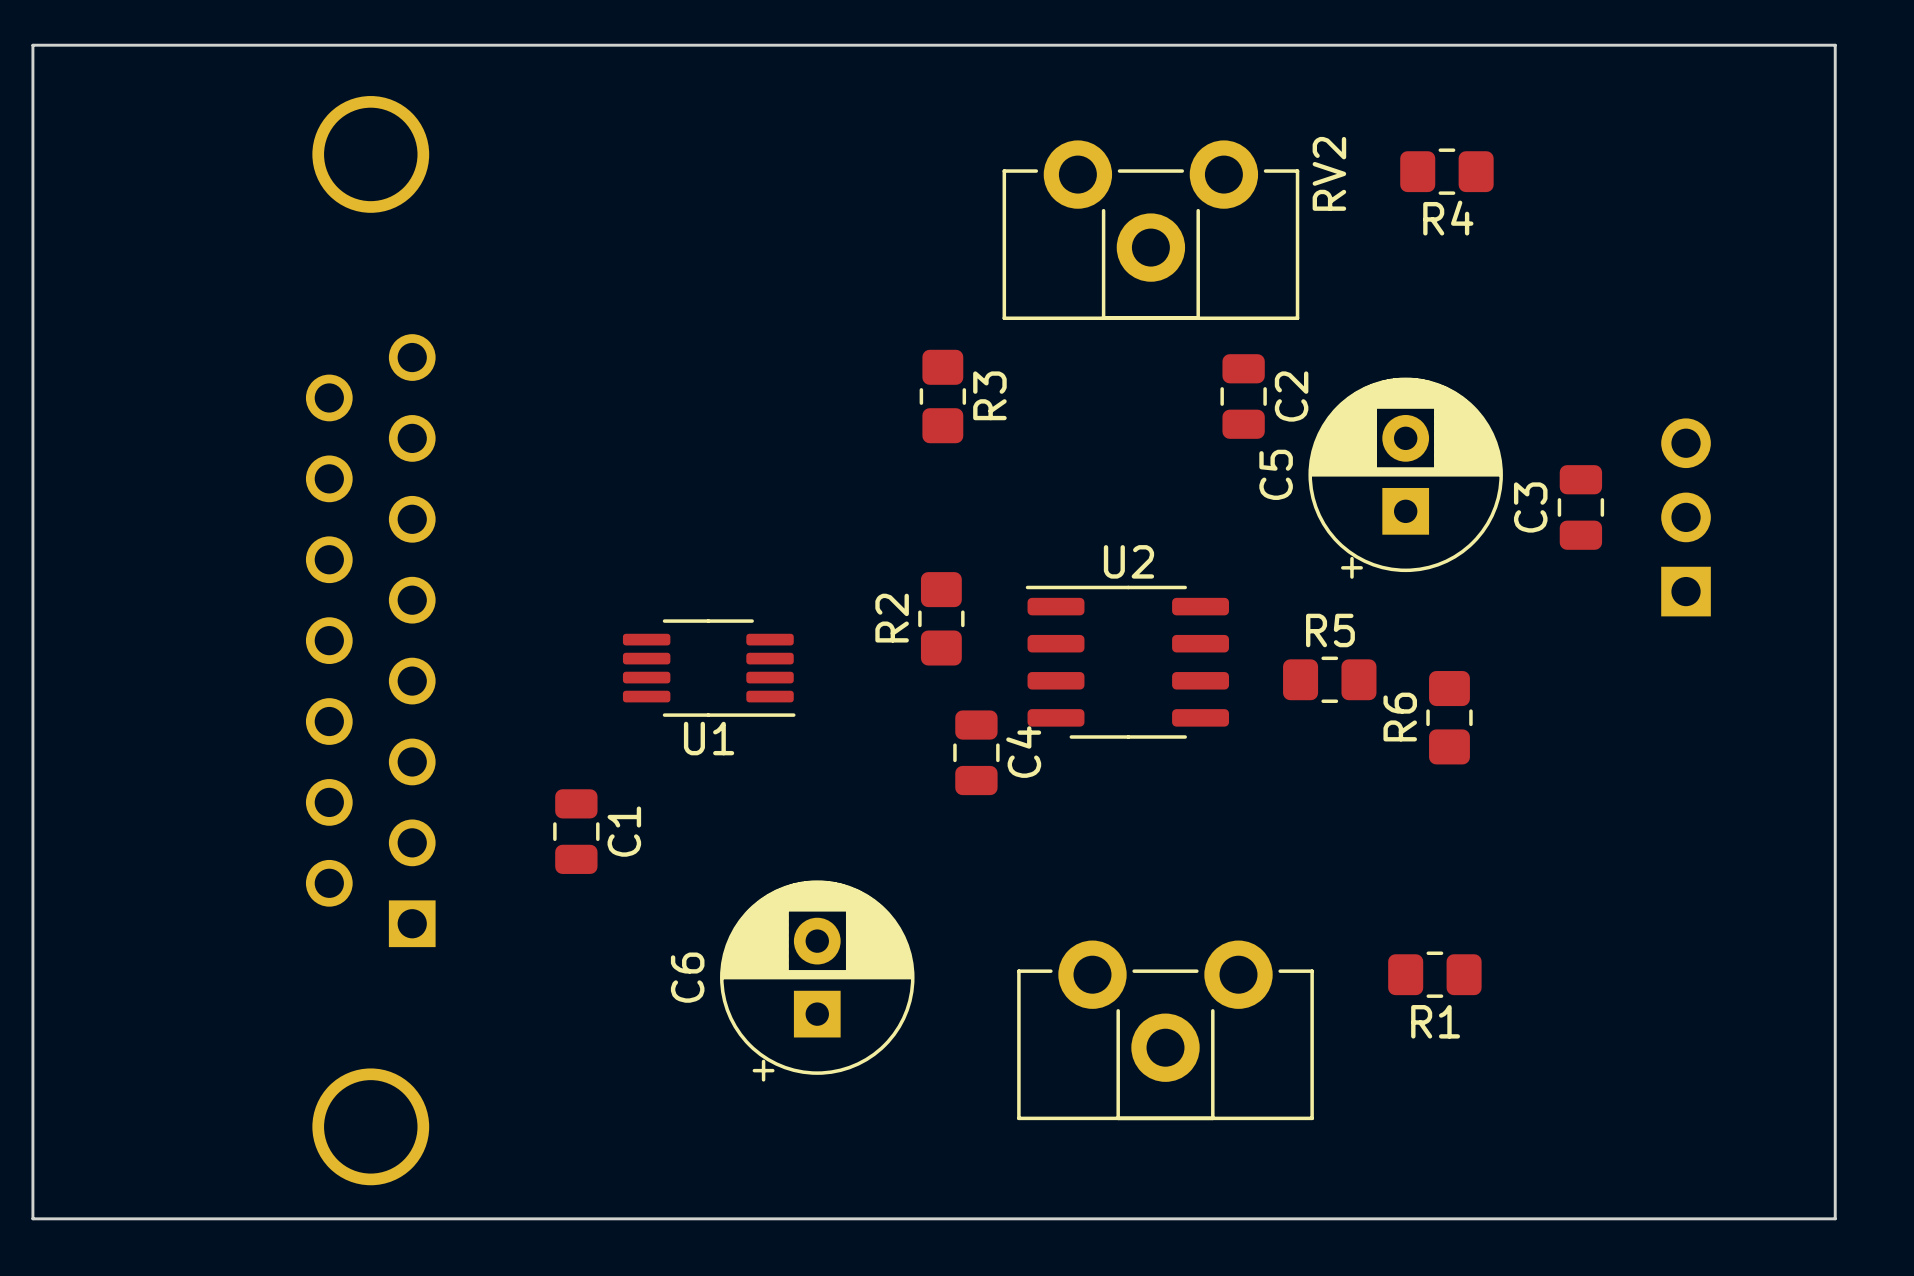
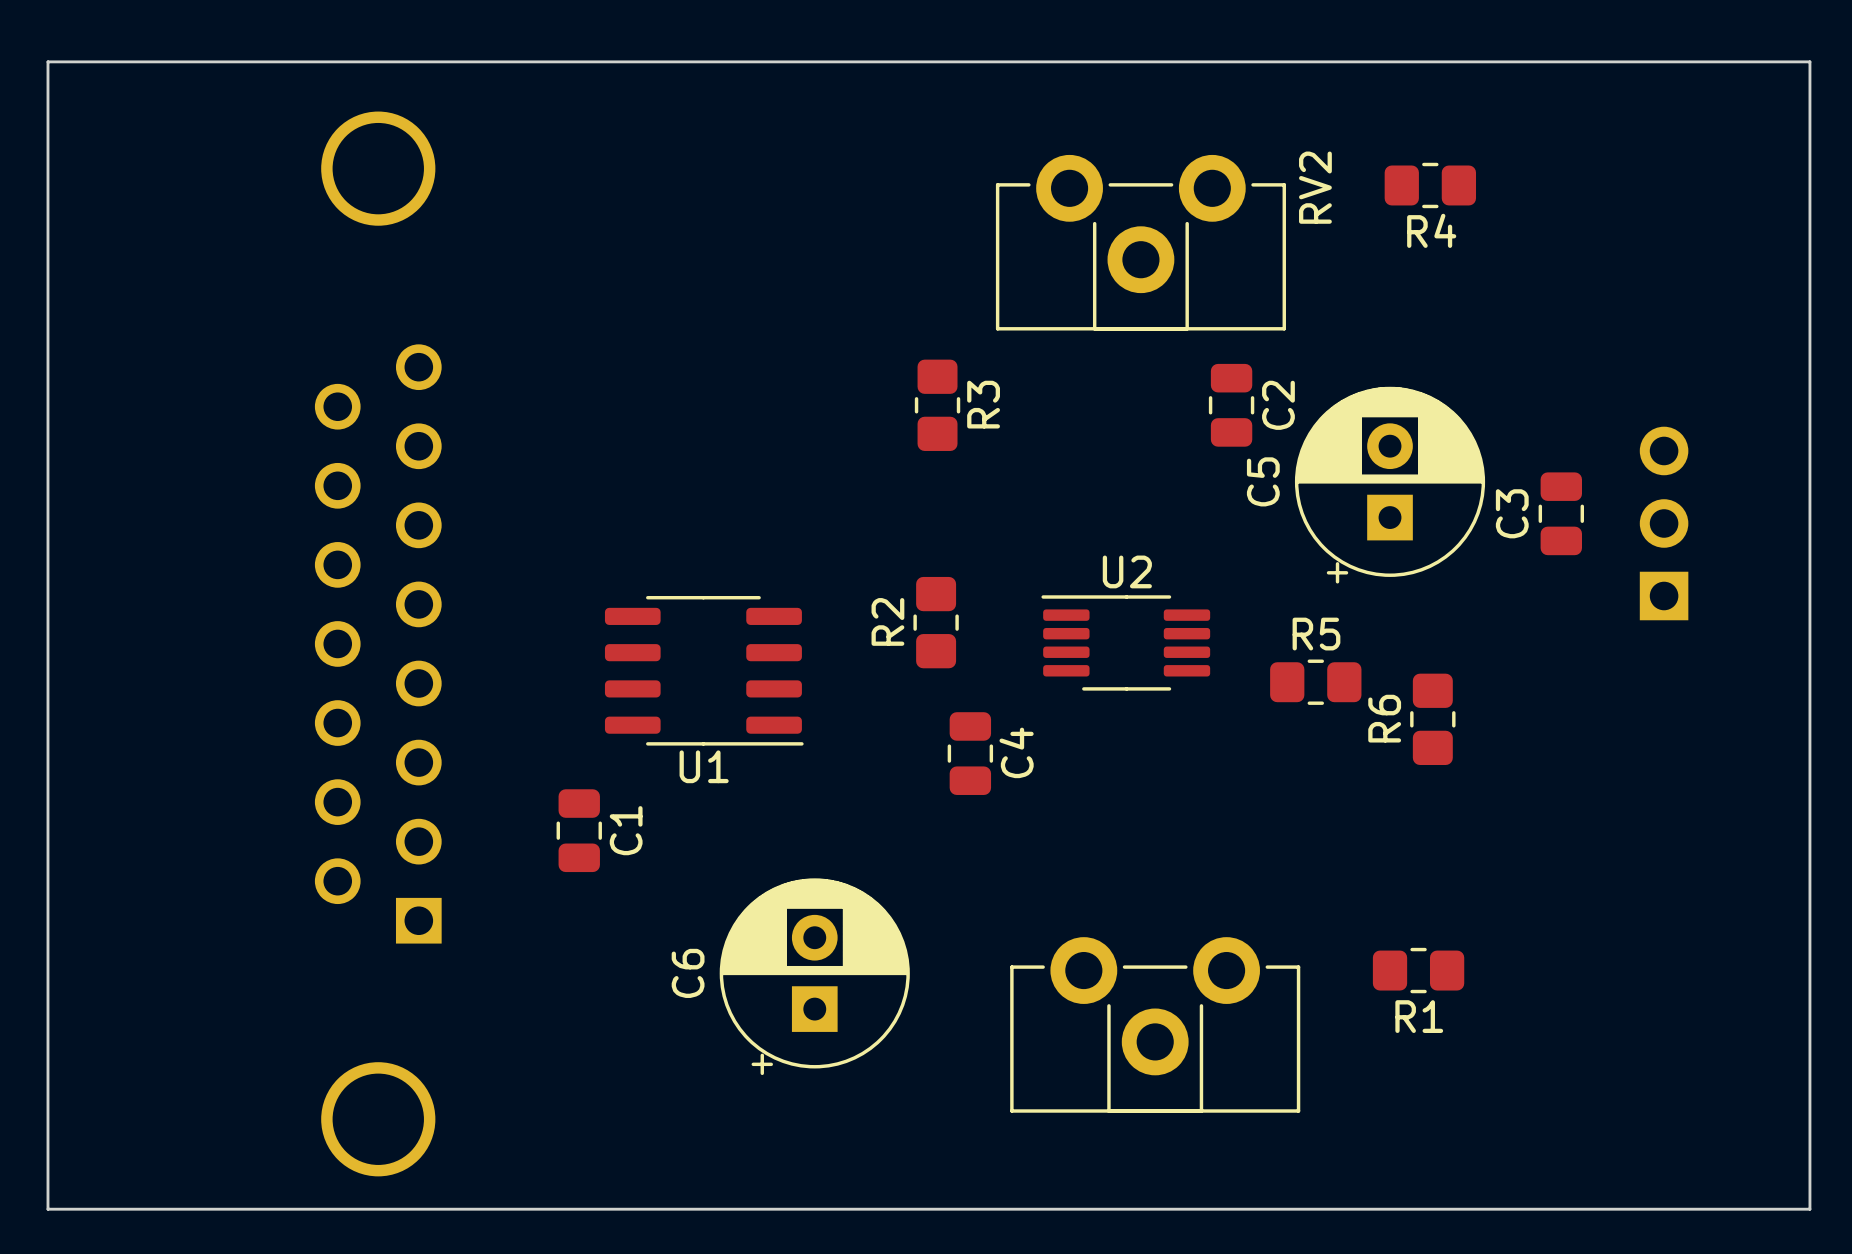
U2 footprint: [1025, 585, 1230, 739] -> [1041, 595, 1211, 691]
U1 footprint: [622, 619, 796, 717] -> [604, 596, 804, 746]

